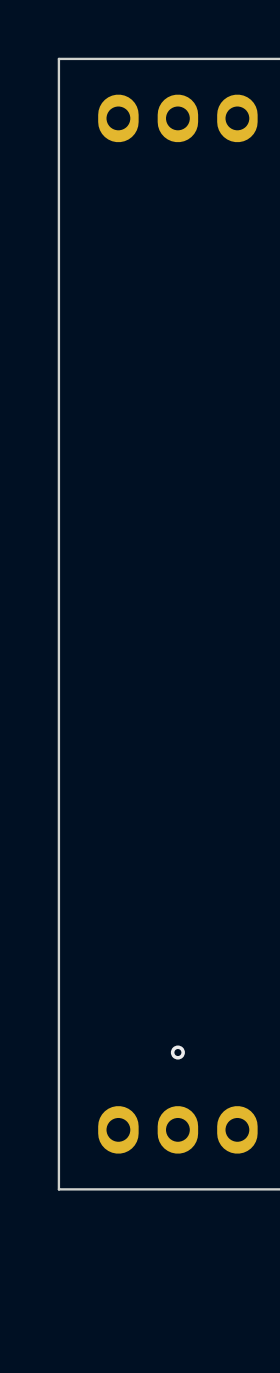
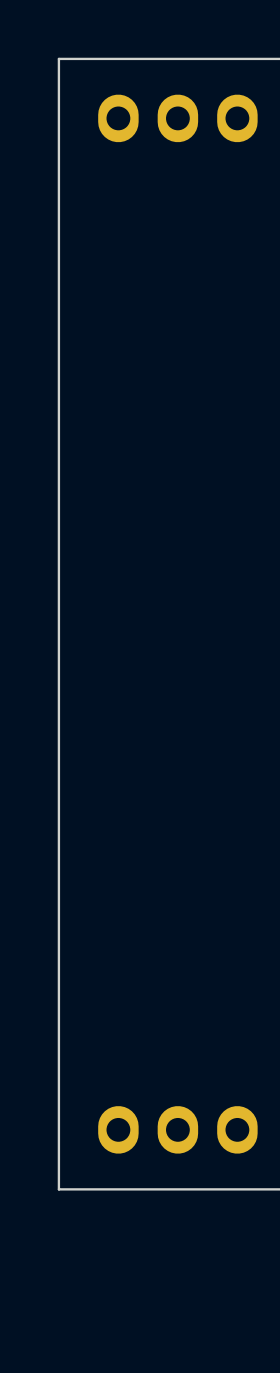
via: (177, 1052) -> none

